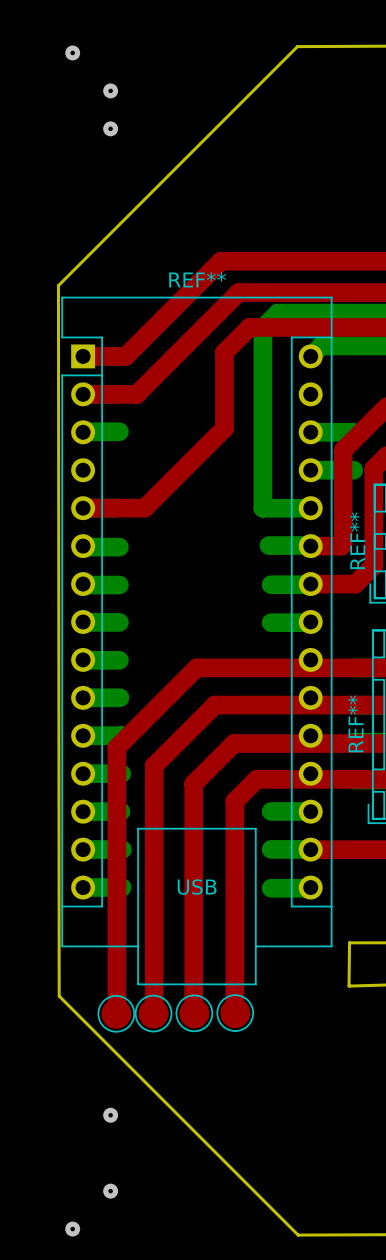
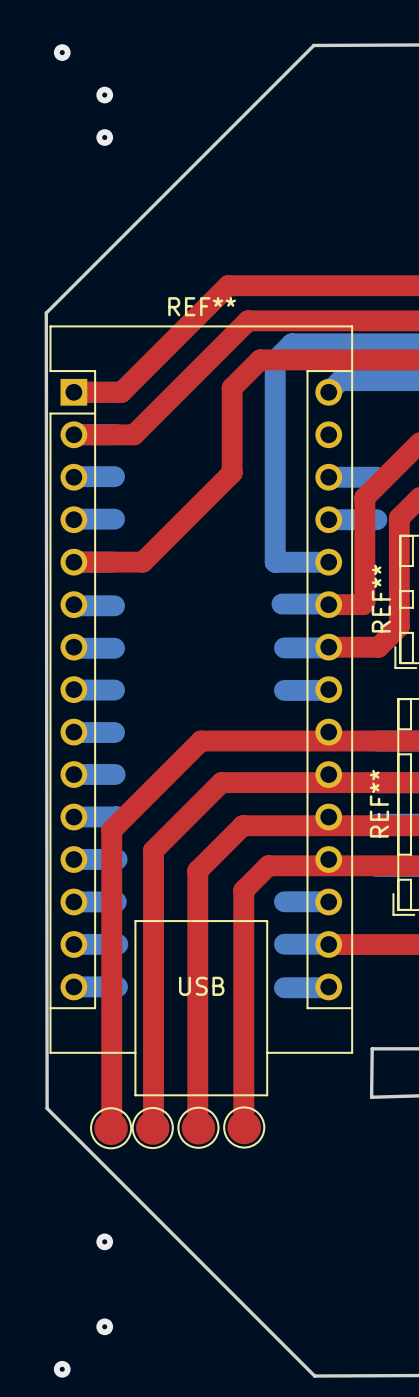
bottom track: none -> (114, 519) (72, 519)

